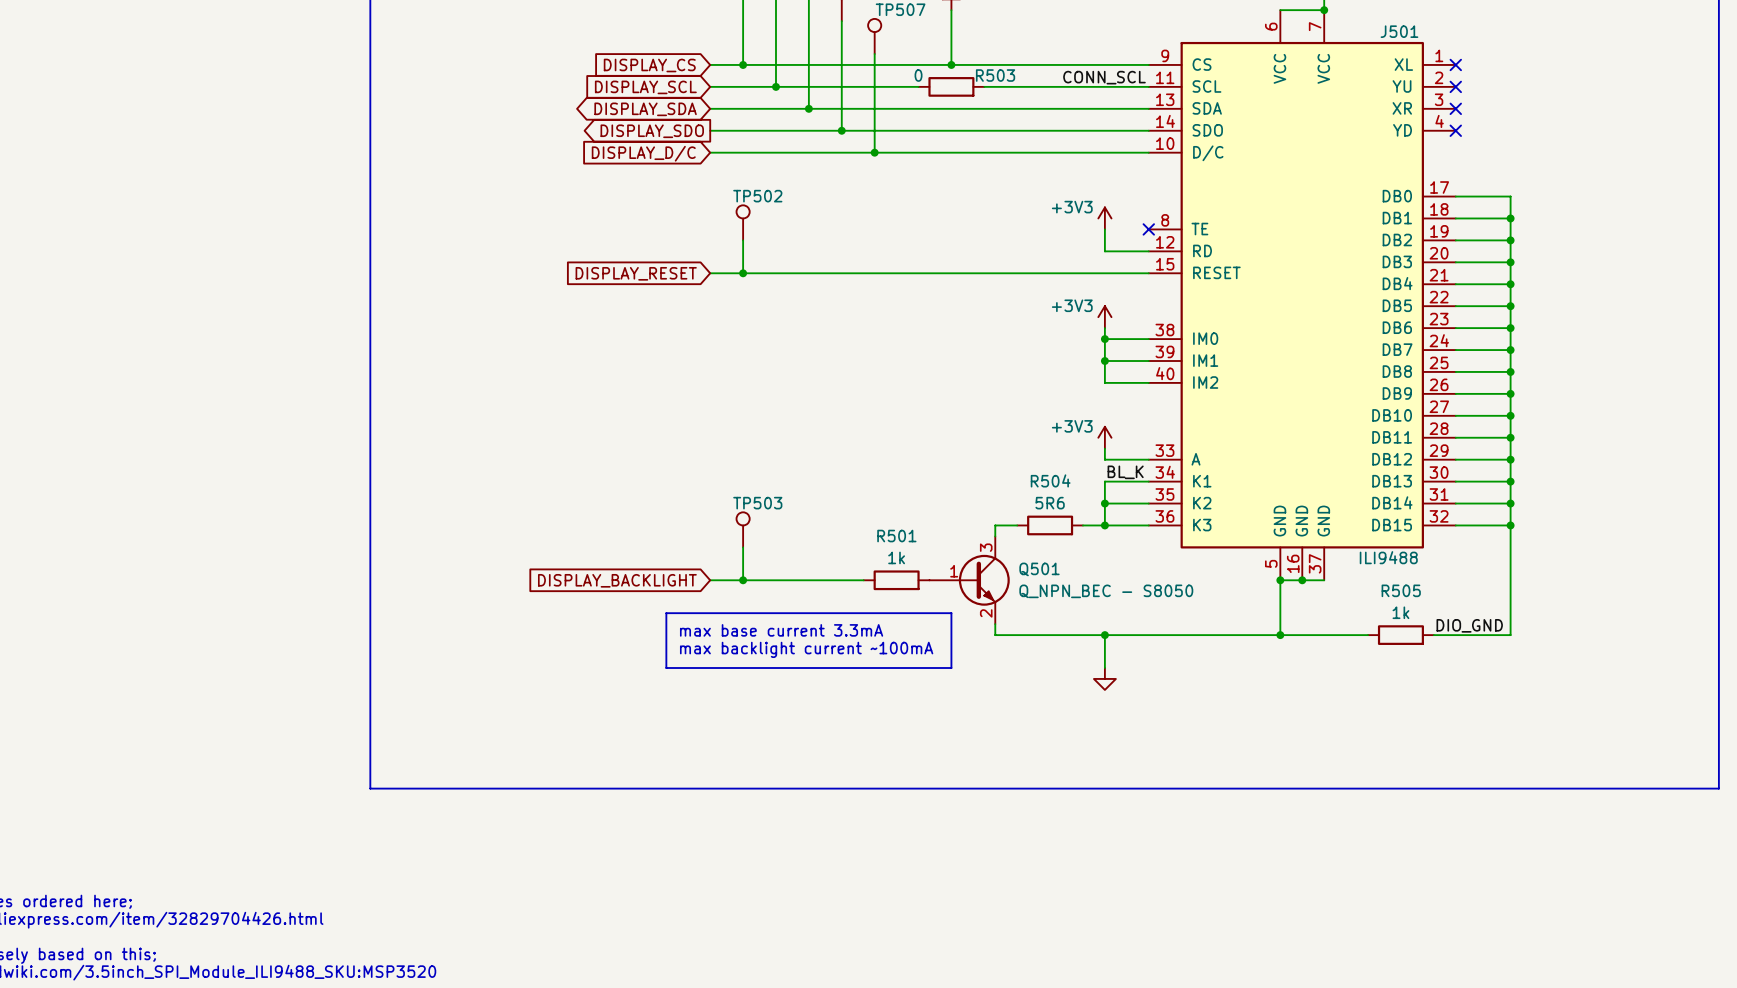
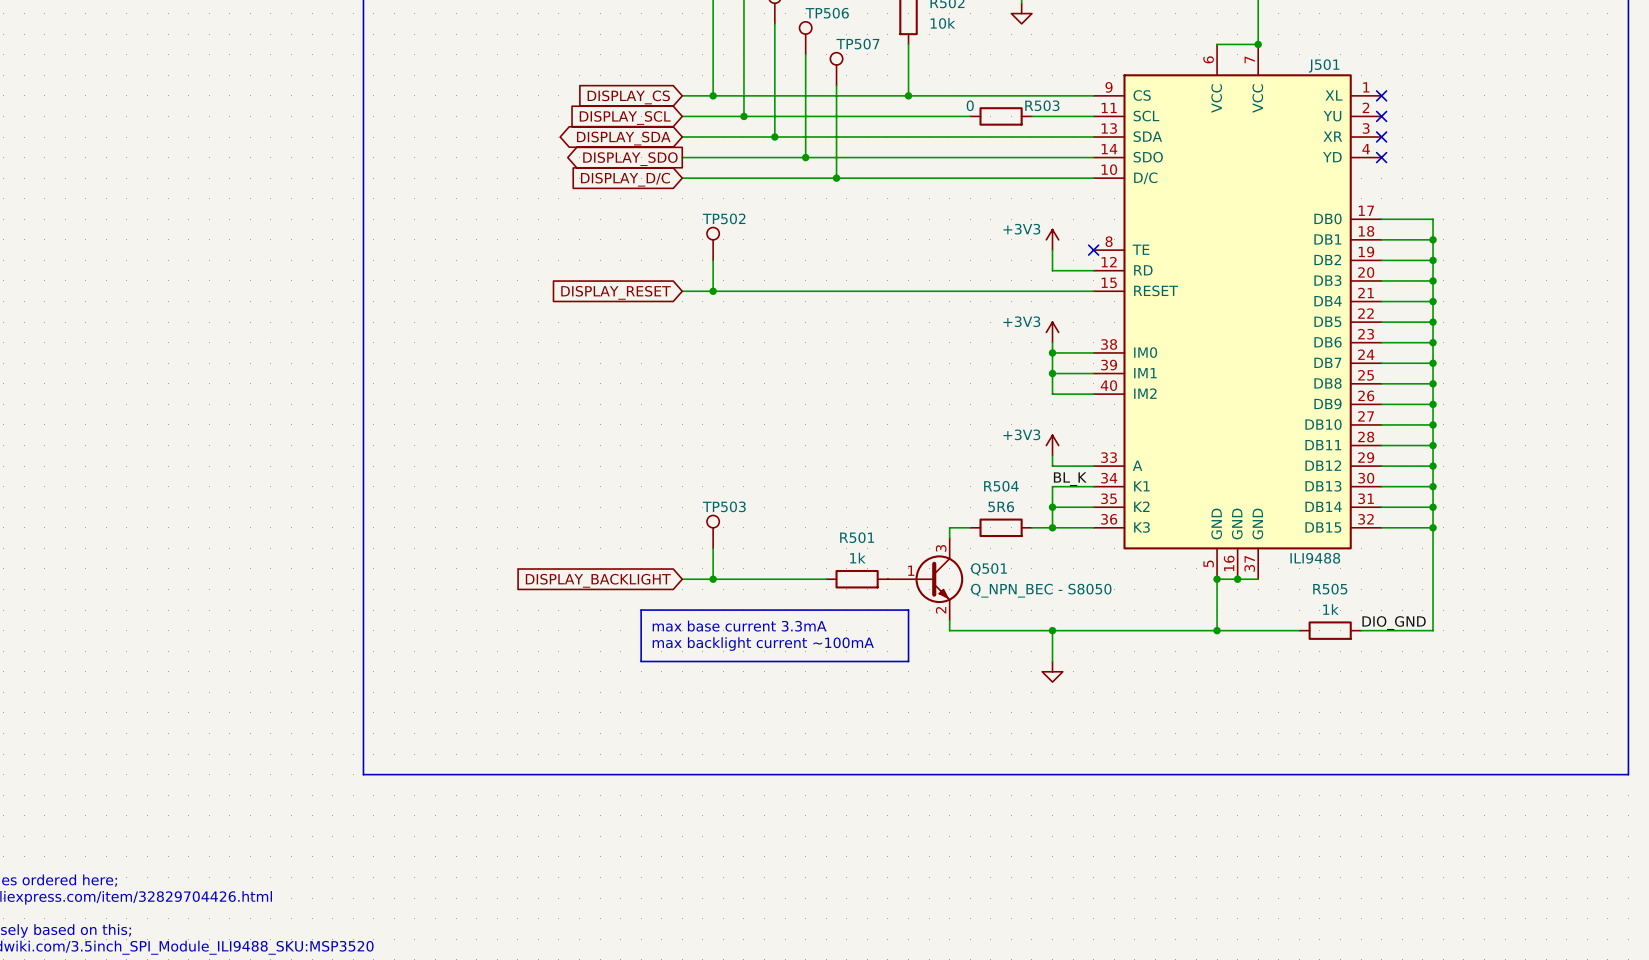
label: CONN_SCL (1104, 77) -> none
R503 position: (951, 86) -> (1001, 116)
wire: (1017, 86) (1082, 86) -> (877, 116) (939, 116)

